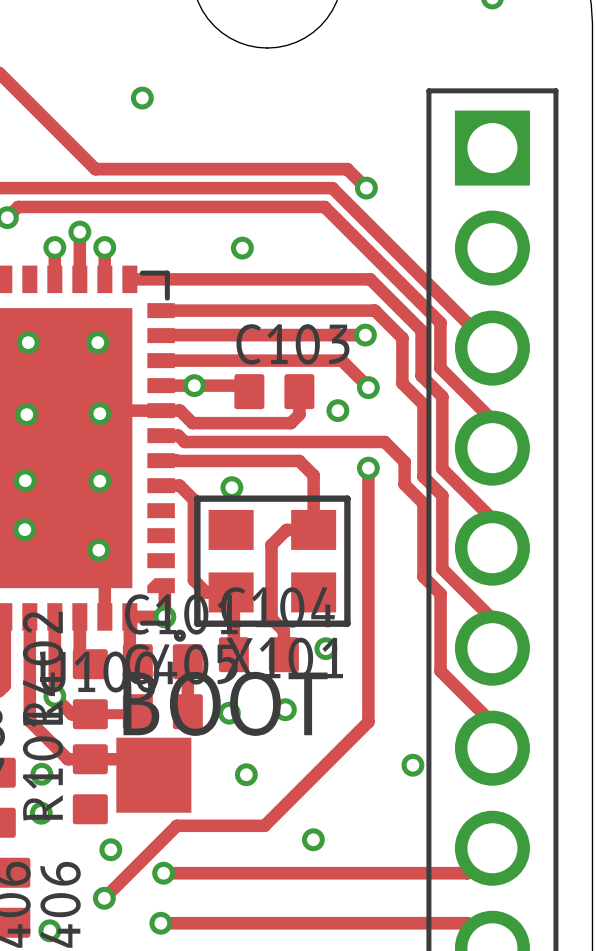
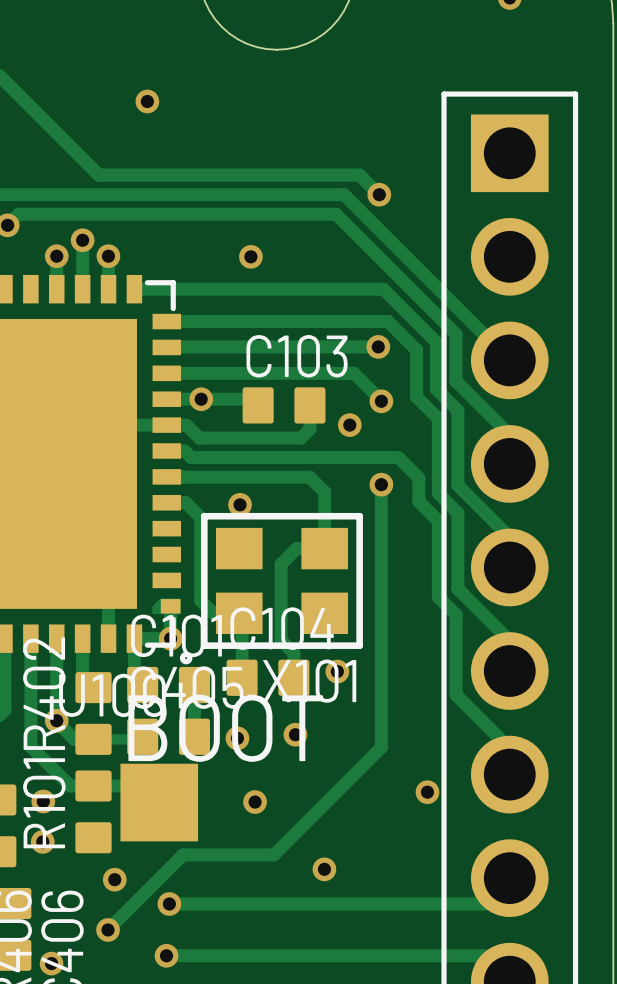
via: (28, 342) -> none
via: (97, 342) -> none
via: (99, 413) -> none
via: (26, 414) -> none
via: (25, 480) -> none
via: (99, 481) -> none
via: (24, 529) -> none
via: (98, 550) -> none

